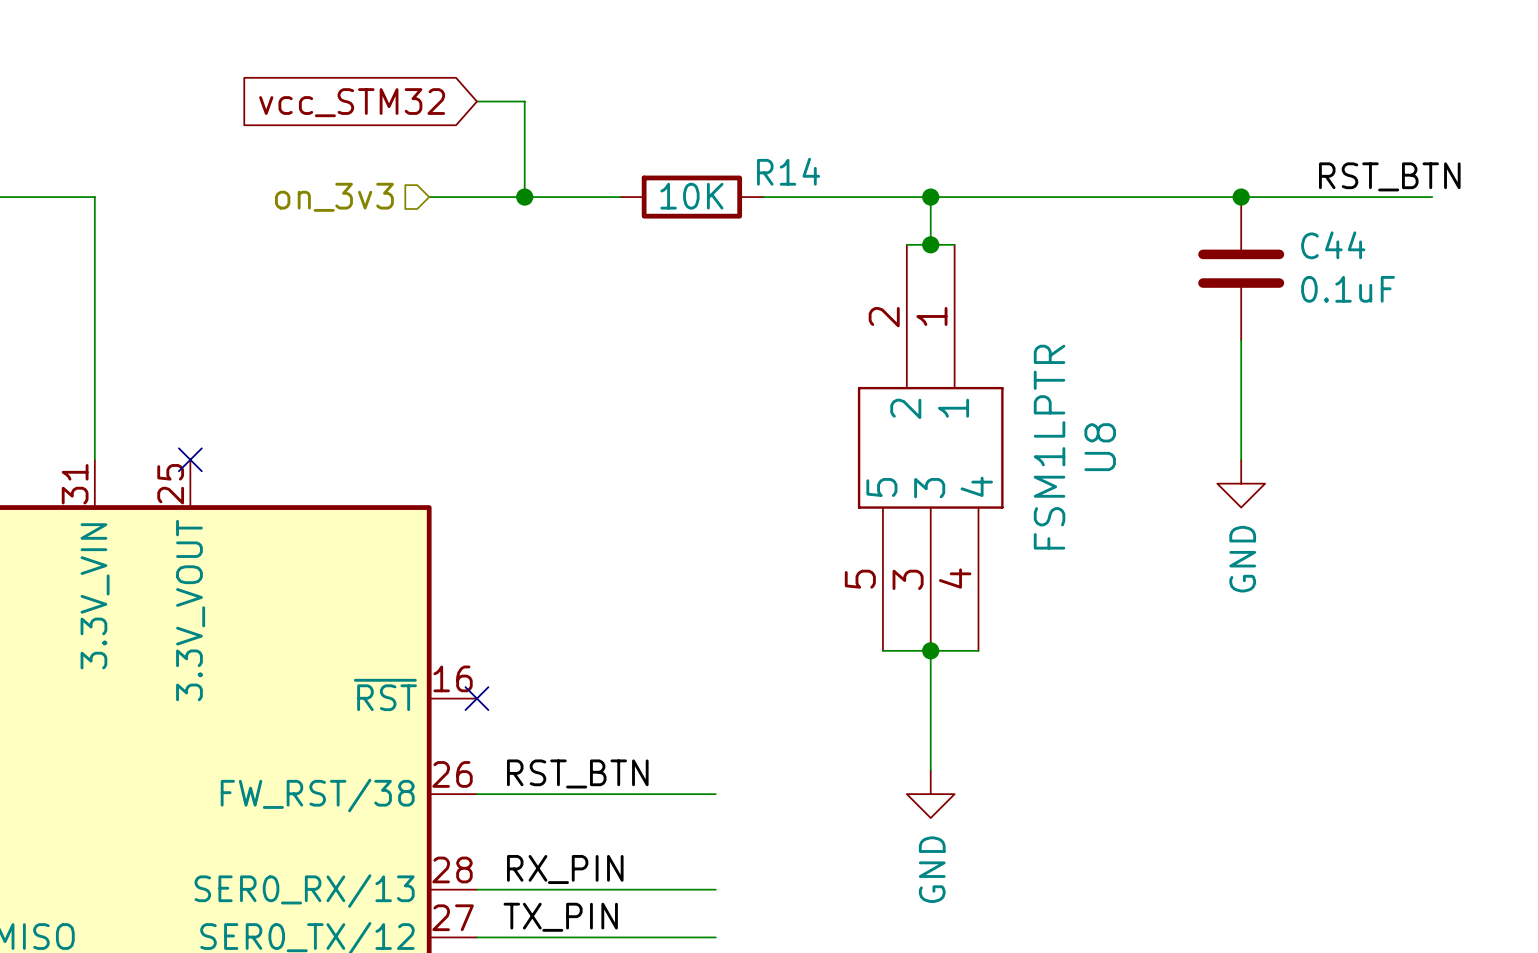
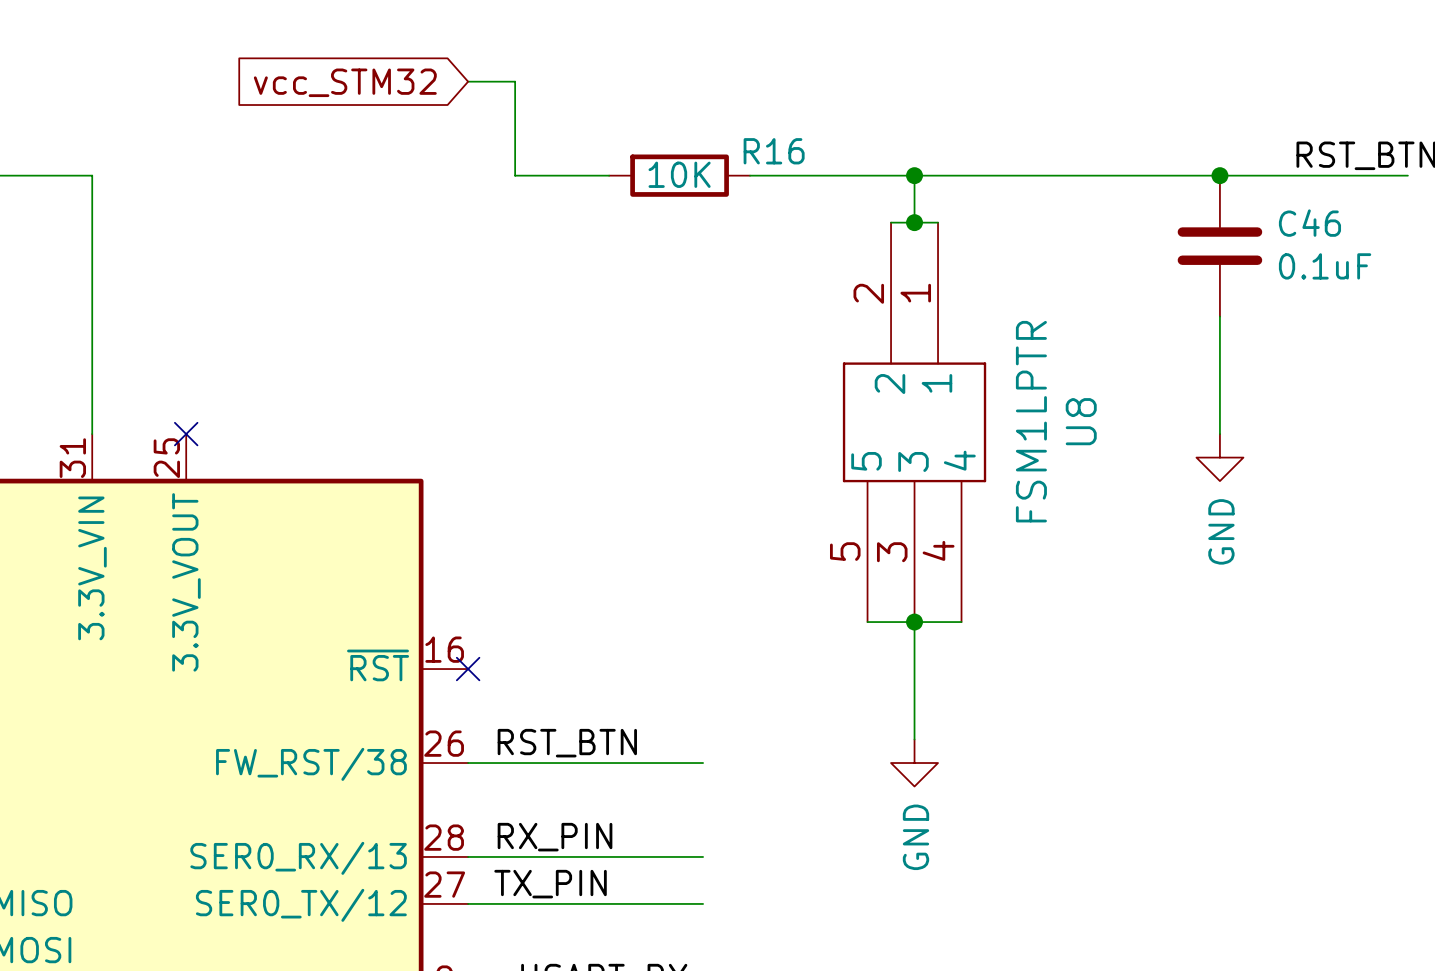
R14 name: R14 (788, 171) -> R16 (774, 151)
hierarchical label: on_3v3 (334, 197) -> none
wire: (429, 197) (524, 197) -> none
junction: (524, 197) -> none
C44 name: C44 (1333, 245) -> C46 (1309, 223)

